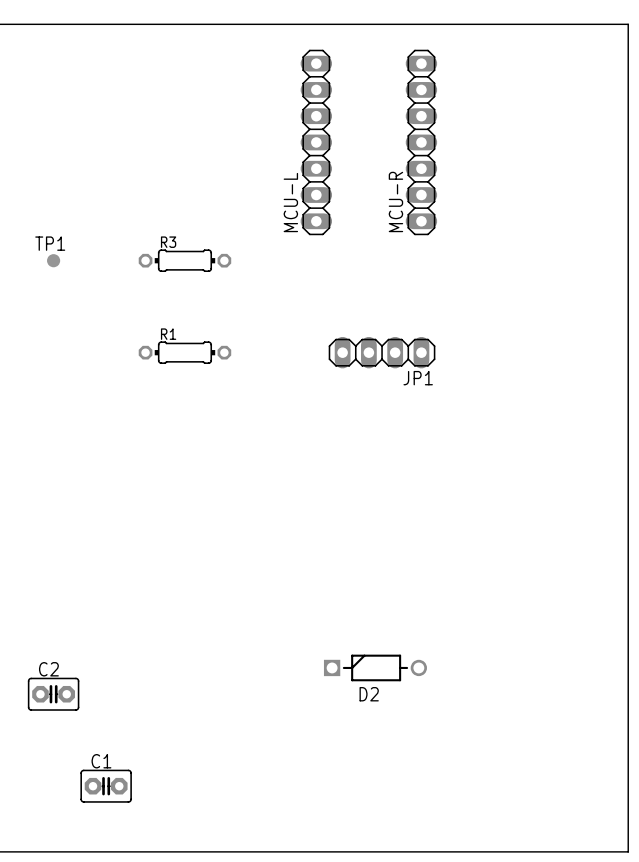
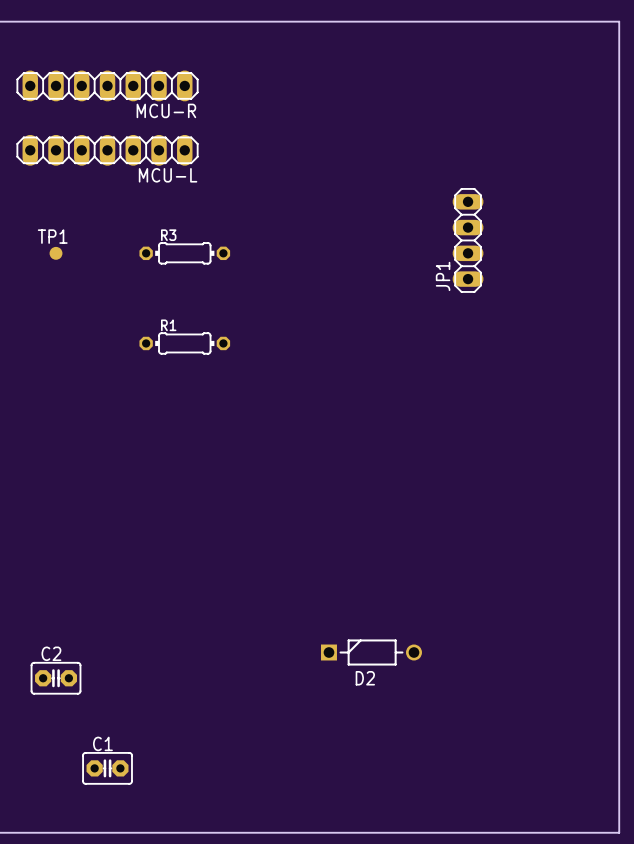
MCU-R: none -> (107, 85)
MCU-L rotation: 0° (316, 142) -> 90° clockwise (107, 150)
MCU-L position: (316, 142) -> (107, 150)
MCU-R: (421, 142) -> none
MCU-L name position: MCU-L (290, 202) -> MCU-L (168, 175)
JP1 rotation: 0° (382, 352) -> 90° clockwise (468, 240)
JP1 position: (382, 352) -> (468, 240)

